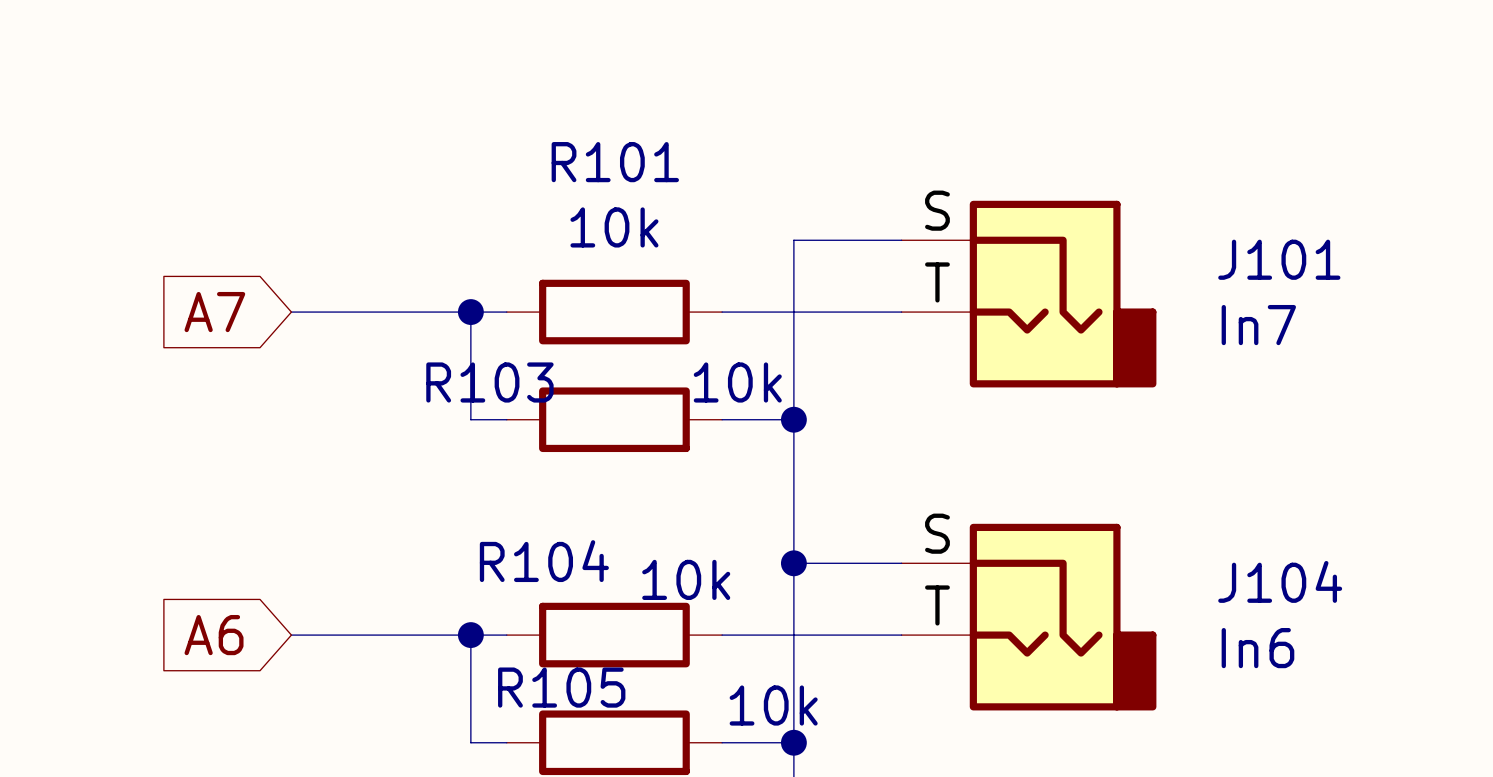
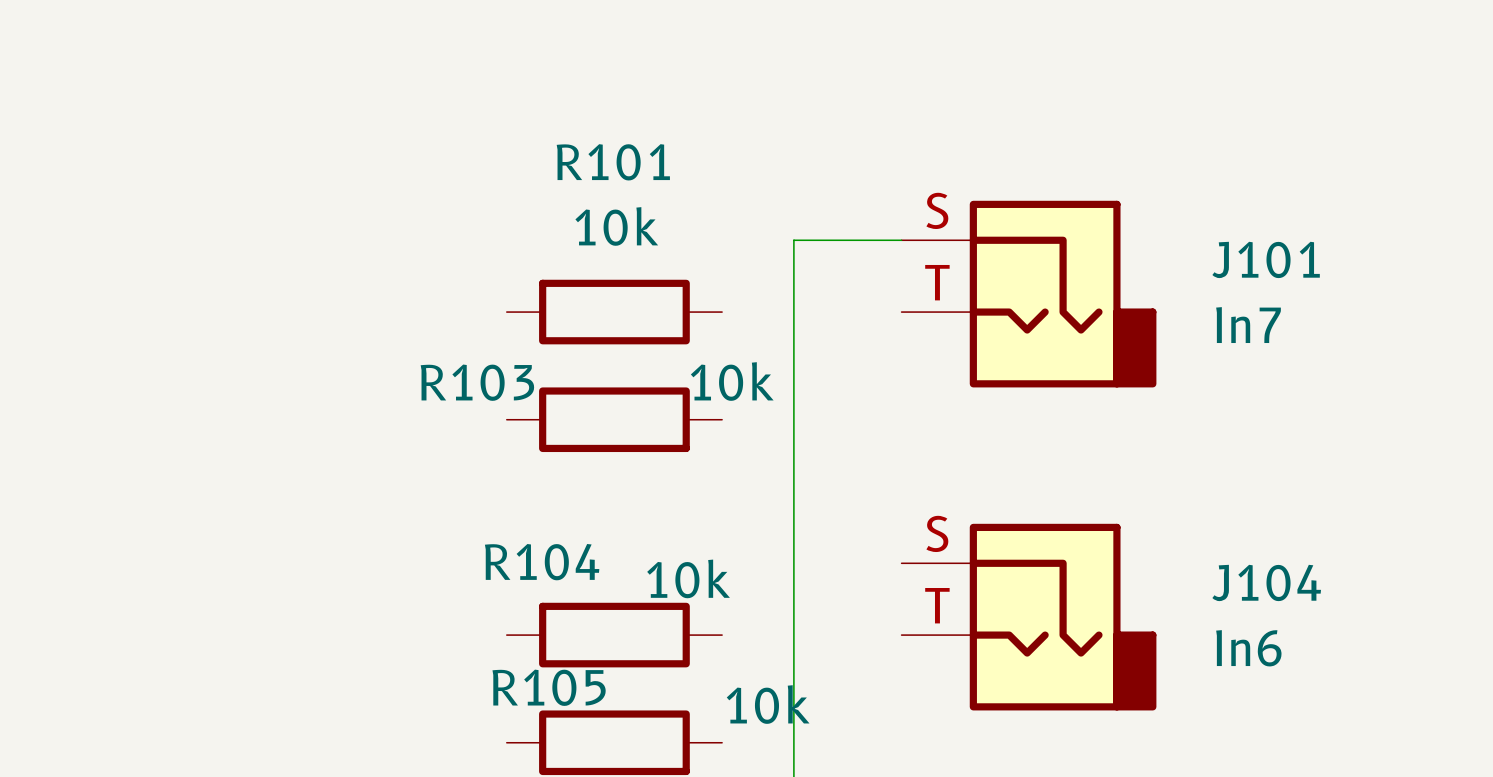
global label: A7 (214, 312) -> none
wire: (291, 312) (506, 312) -> none
wire: (470, 312) (470, 419) (506, 419) -> none
junction: (470, 312) -> none
wire: (722, 312) (901, 312) -> none
wire: (722, 419) (793, 419) -> none
junction: (793, 419) -> none
wire: (793, 563) (901, 563) -> none
junction: (793, 563) -> none
global label: A6 (214, 635) -> none
wire: (291, 635) (506, 635) -> none
wire: (470, 635) (470, 742) (506, 742) -> none
junction: (470, 635) -> none
wire: (722, 635) (901, 635) -> none
wire: (722, 742) (793, 742) -> none
junction: (793, 742) -> none

